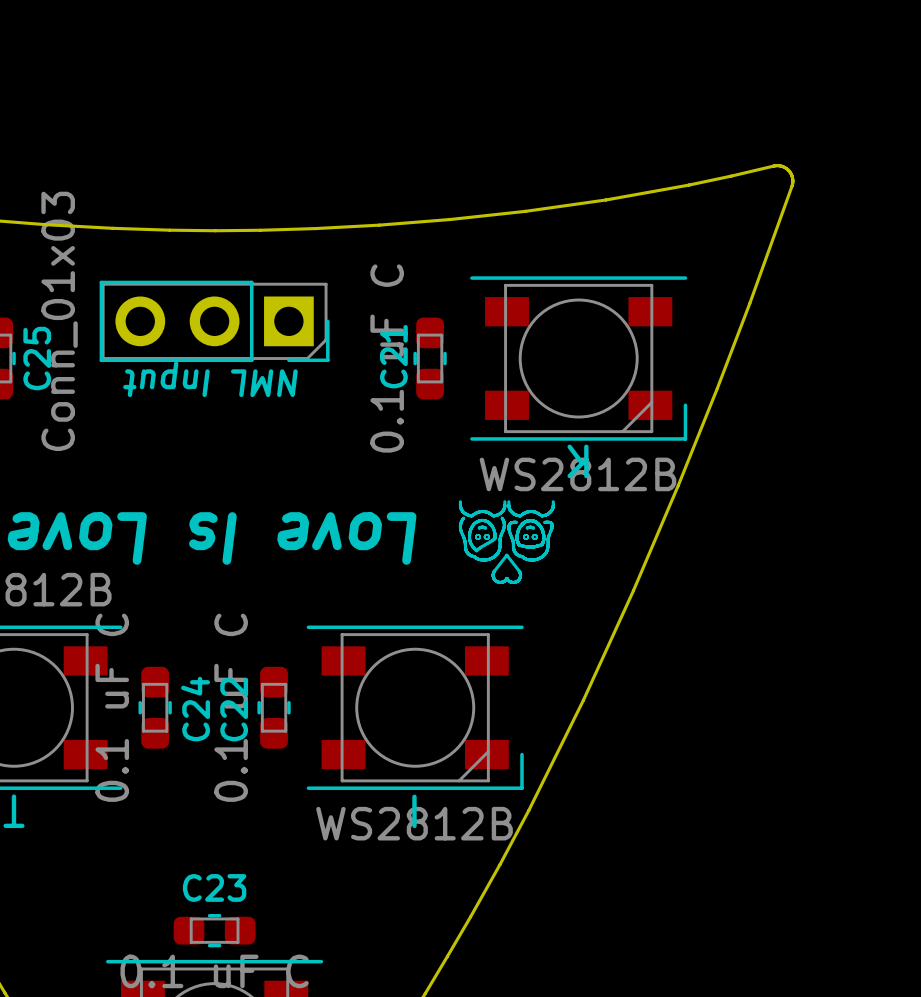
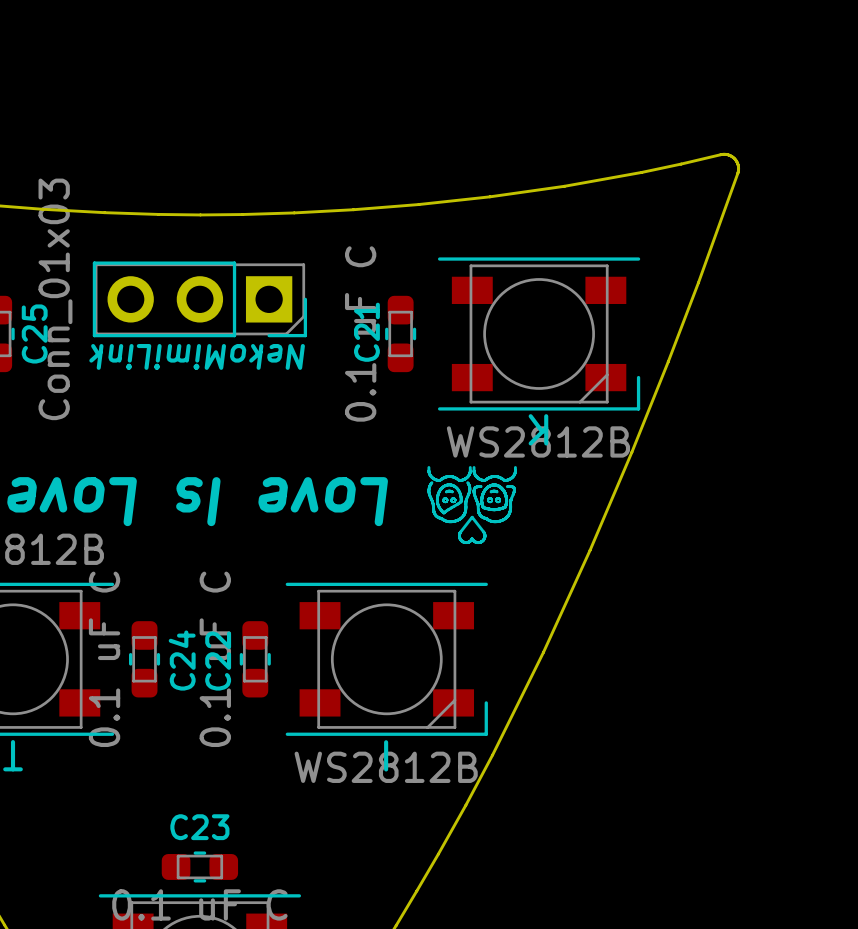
NML Input name: NML Input (210, 379) -> NekoMimiLink (197, 356)

